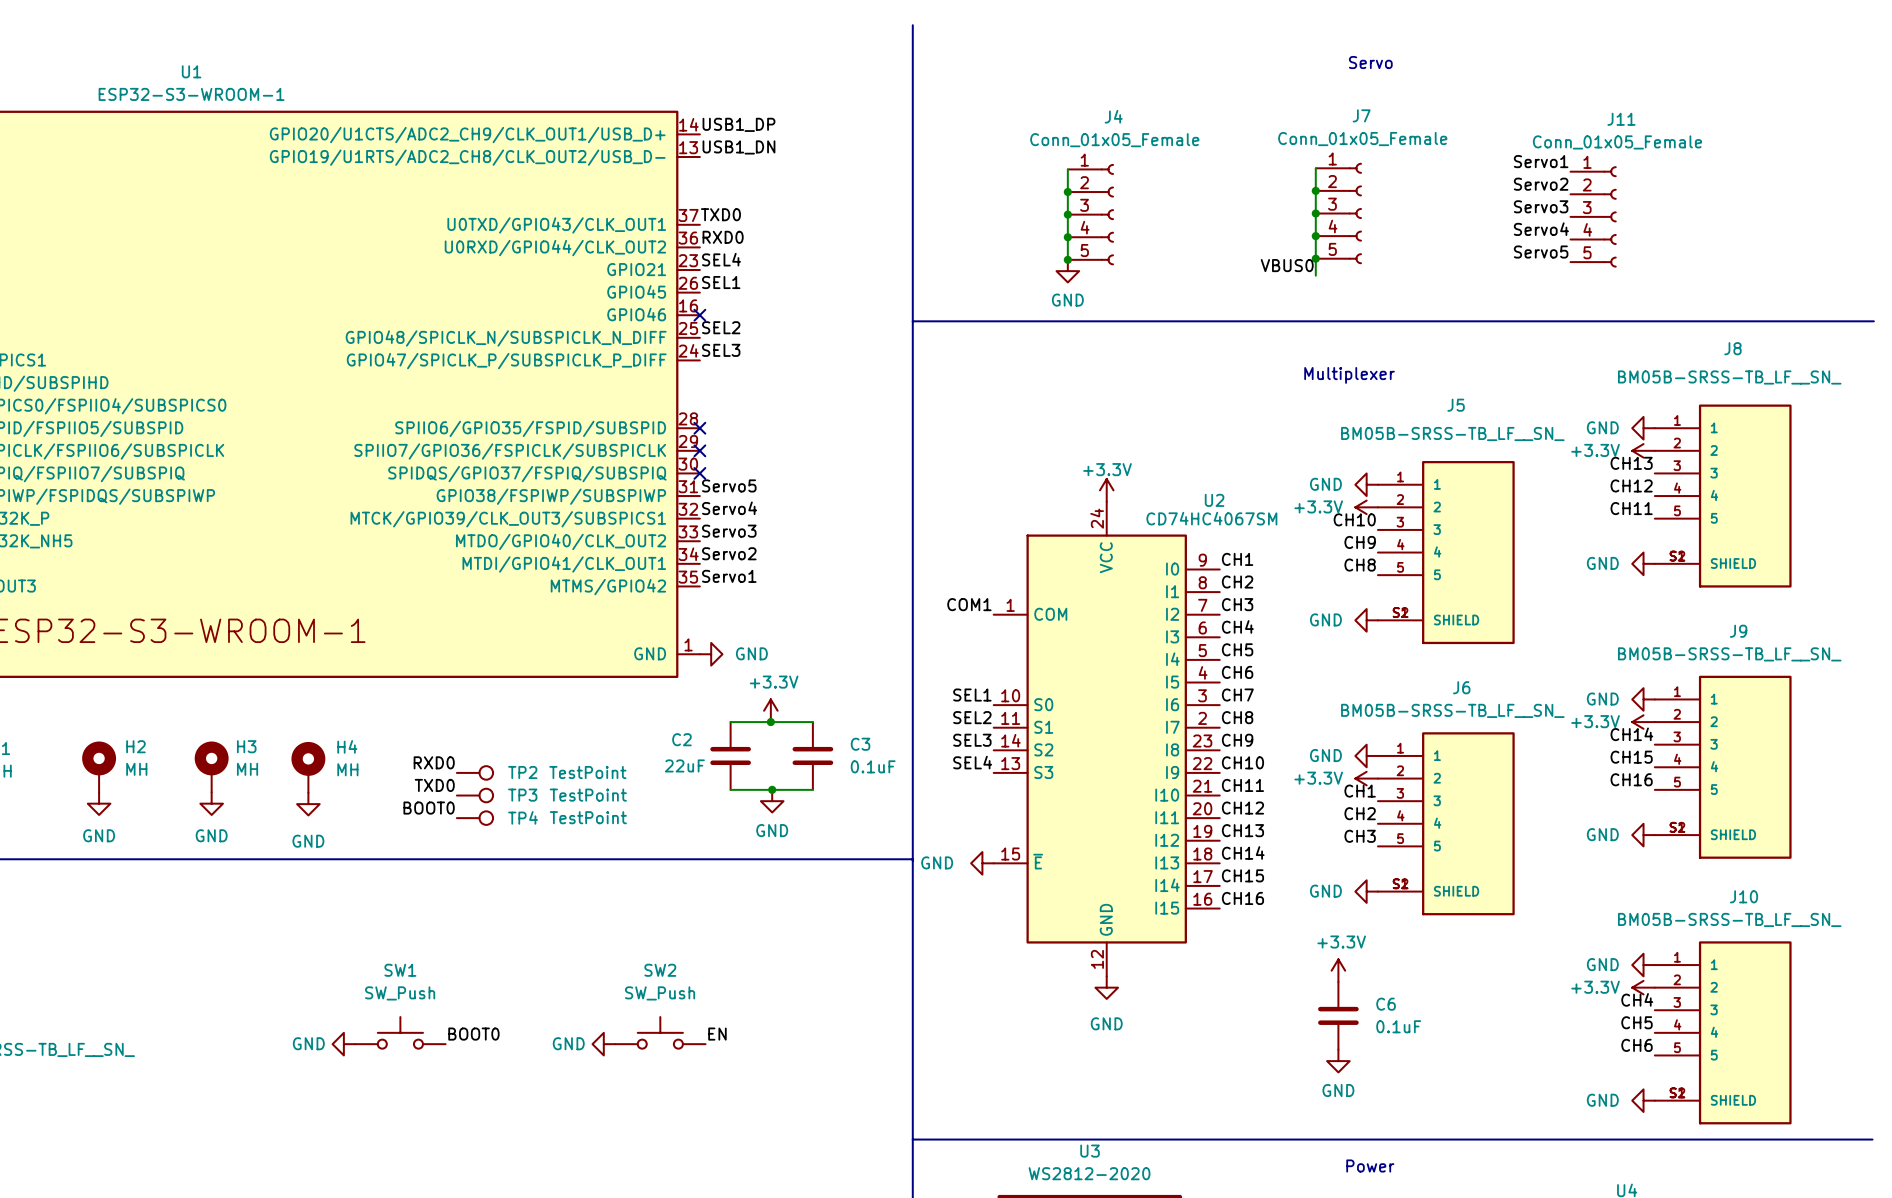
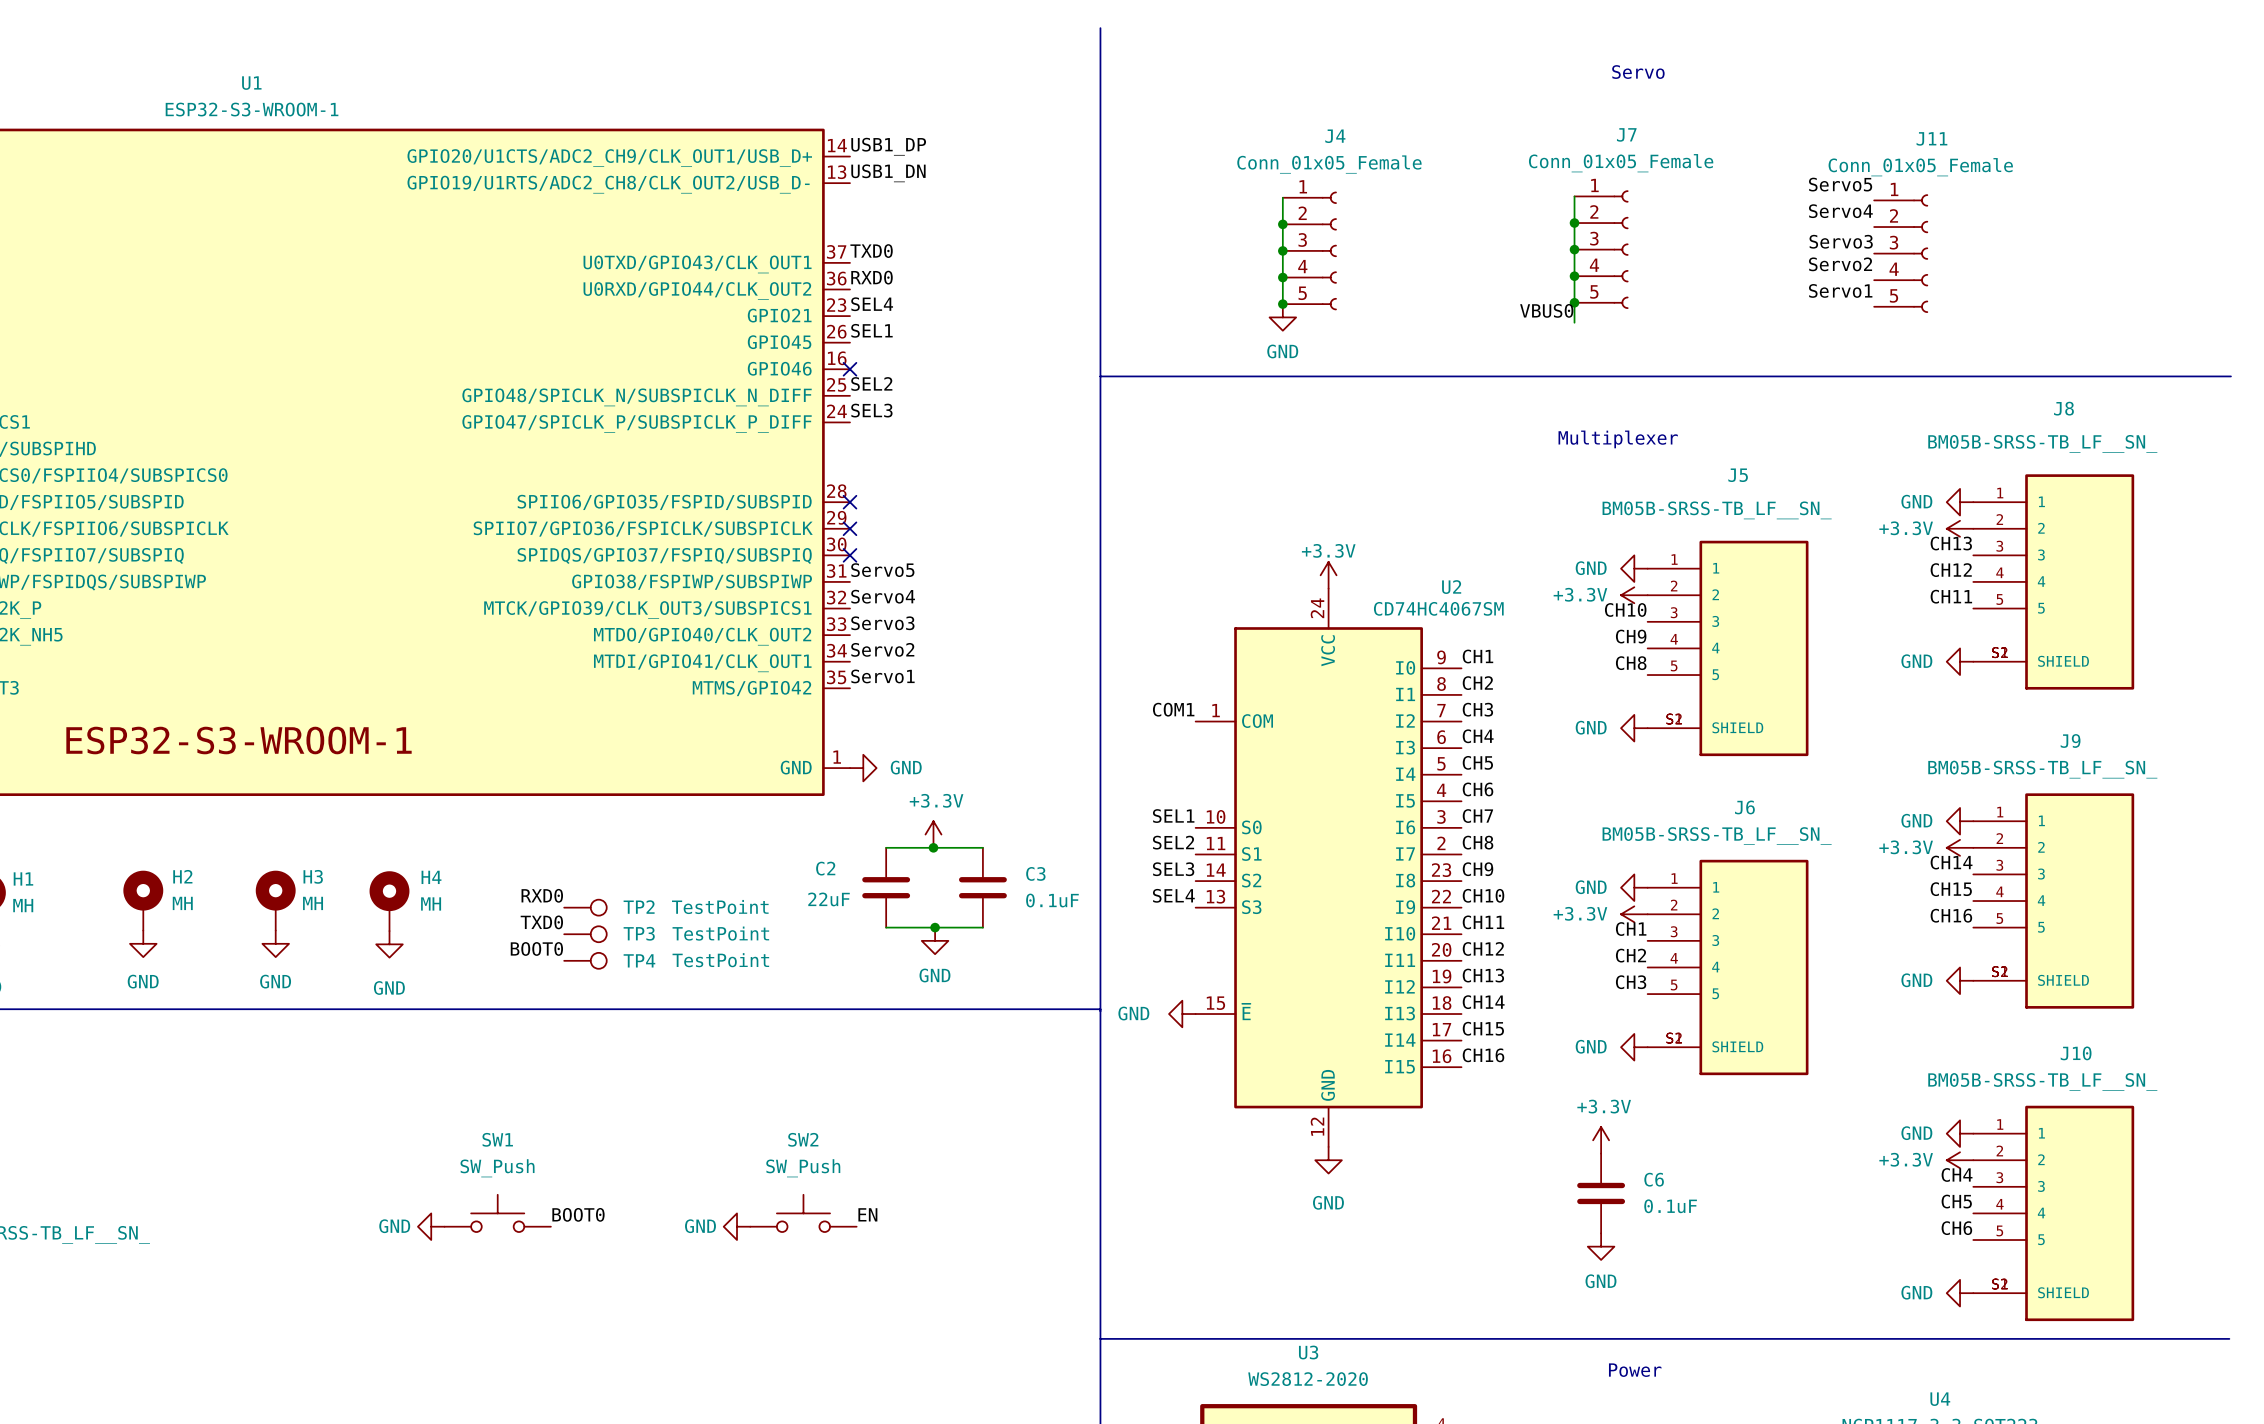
label: Servo1 (1541, 161) -> Servo5 (1840, 184)
label: Servo2 (1541, 184) -> Servo4 (1840, 211)
label: Servo4 (1541, 229) -> Servo2 (1840, 264)
label: Servo5 (1541, 252) -> Servo1 (1840, 290)

